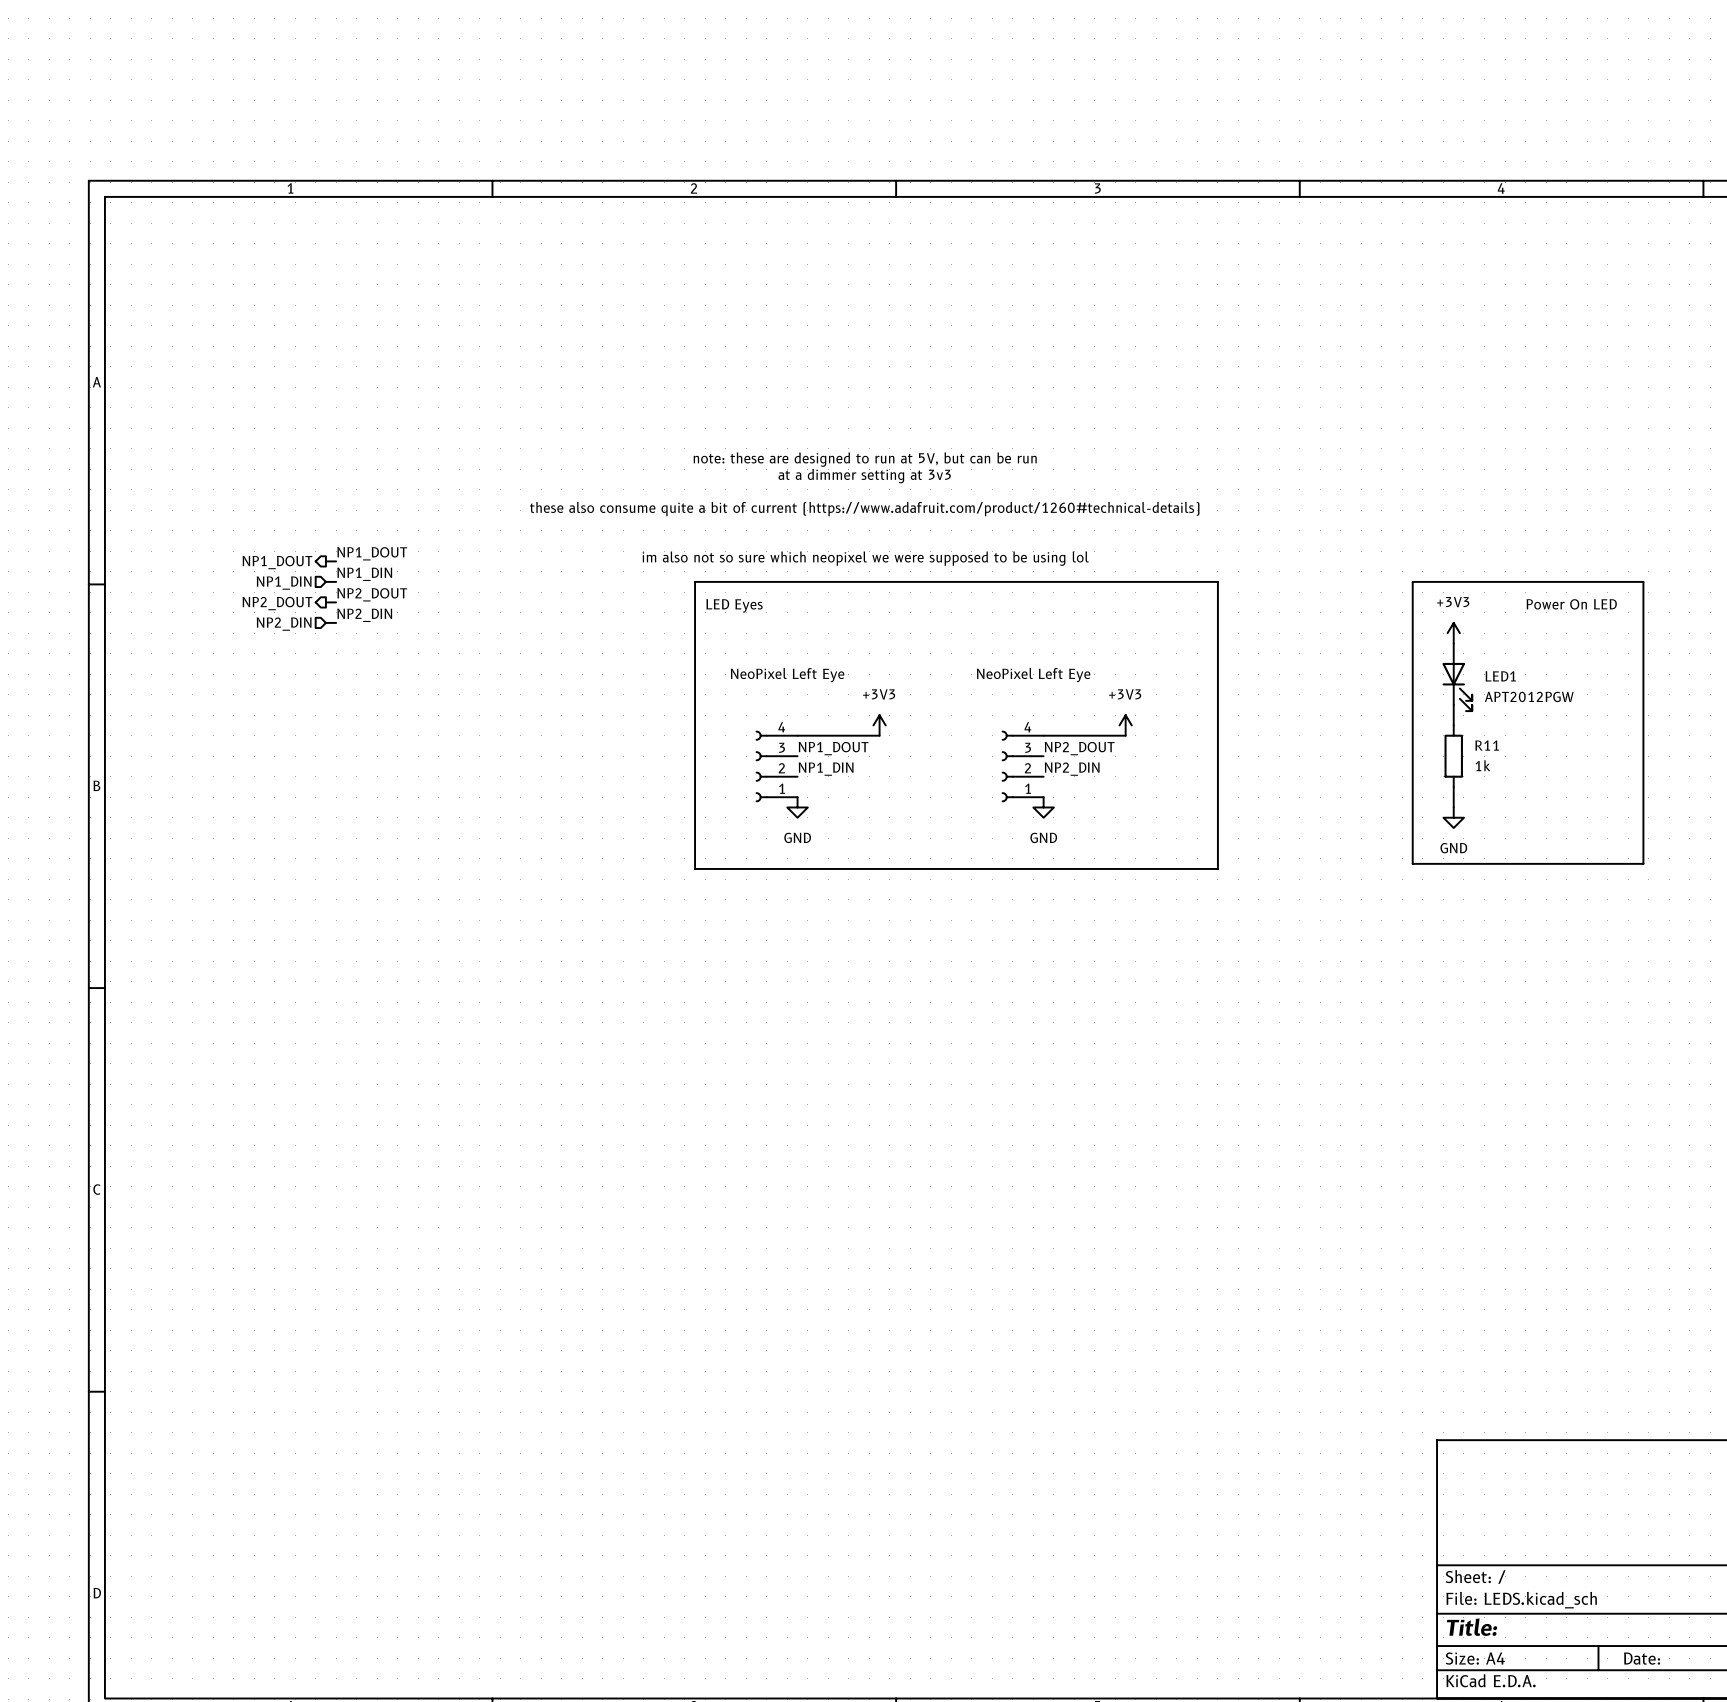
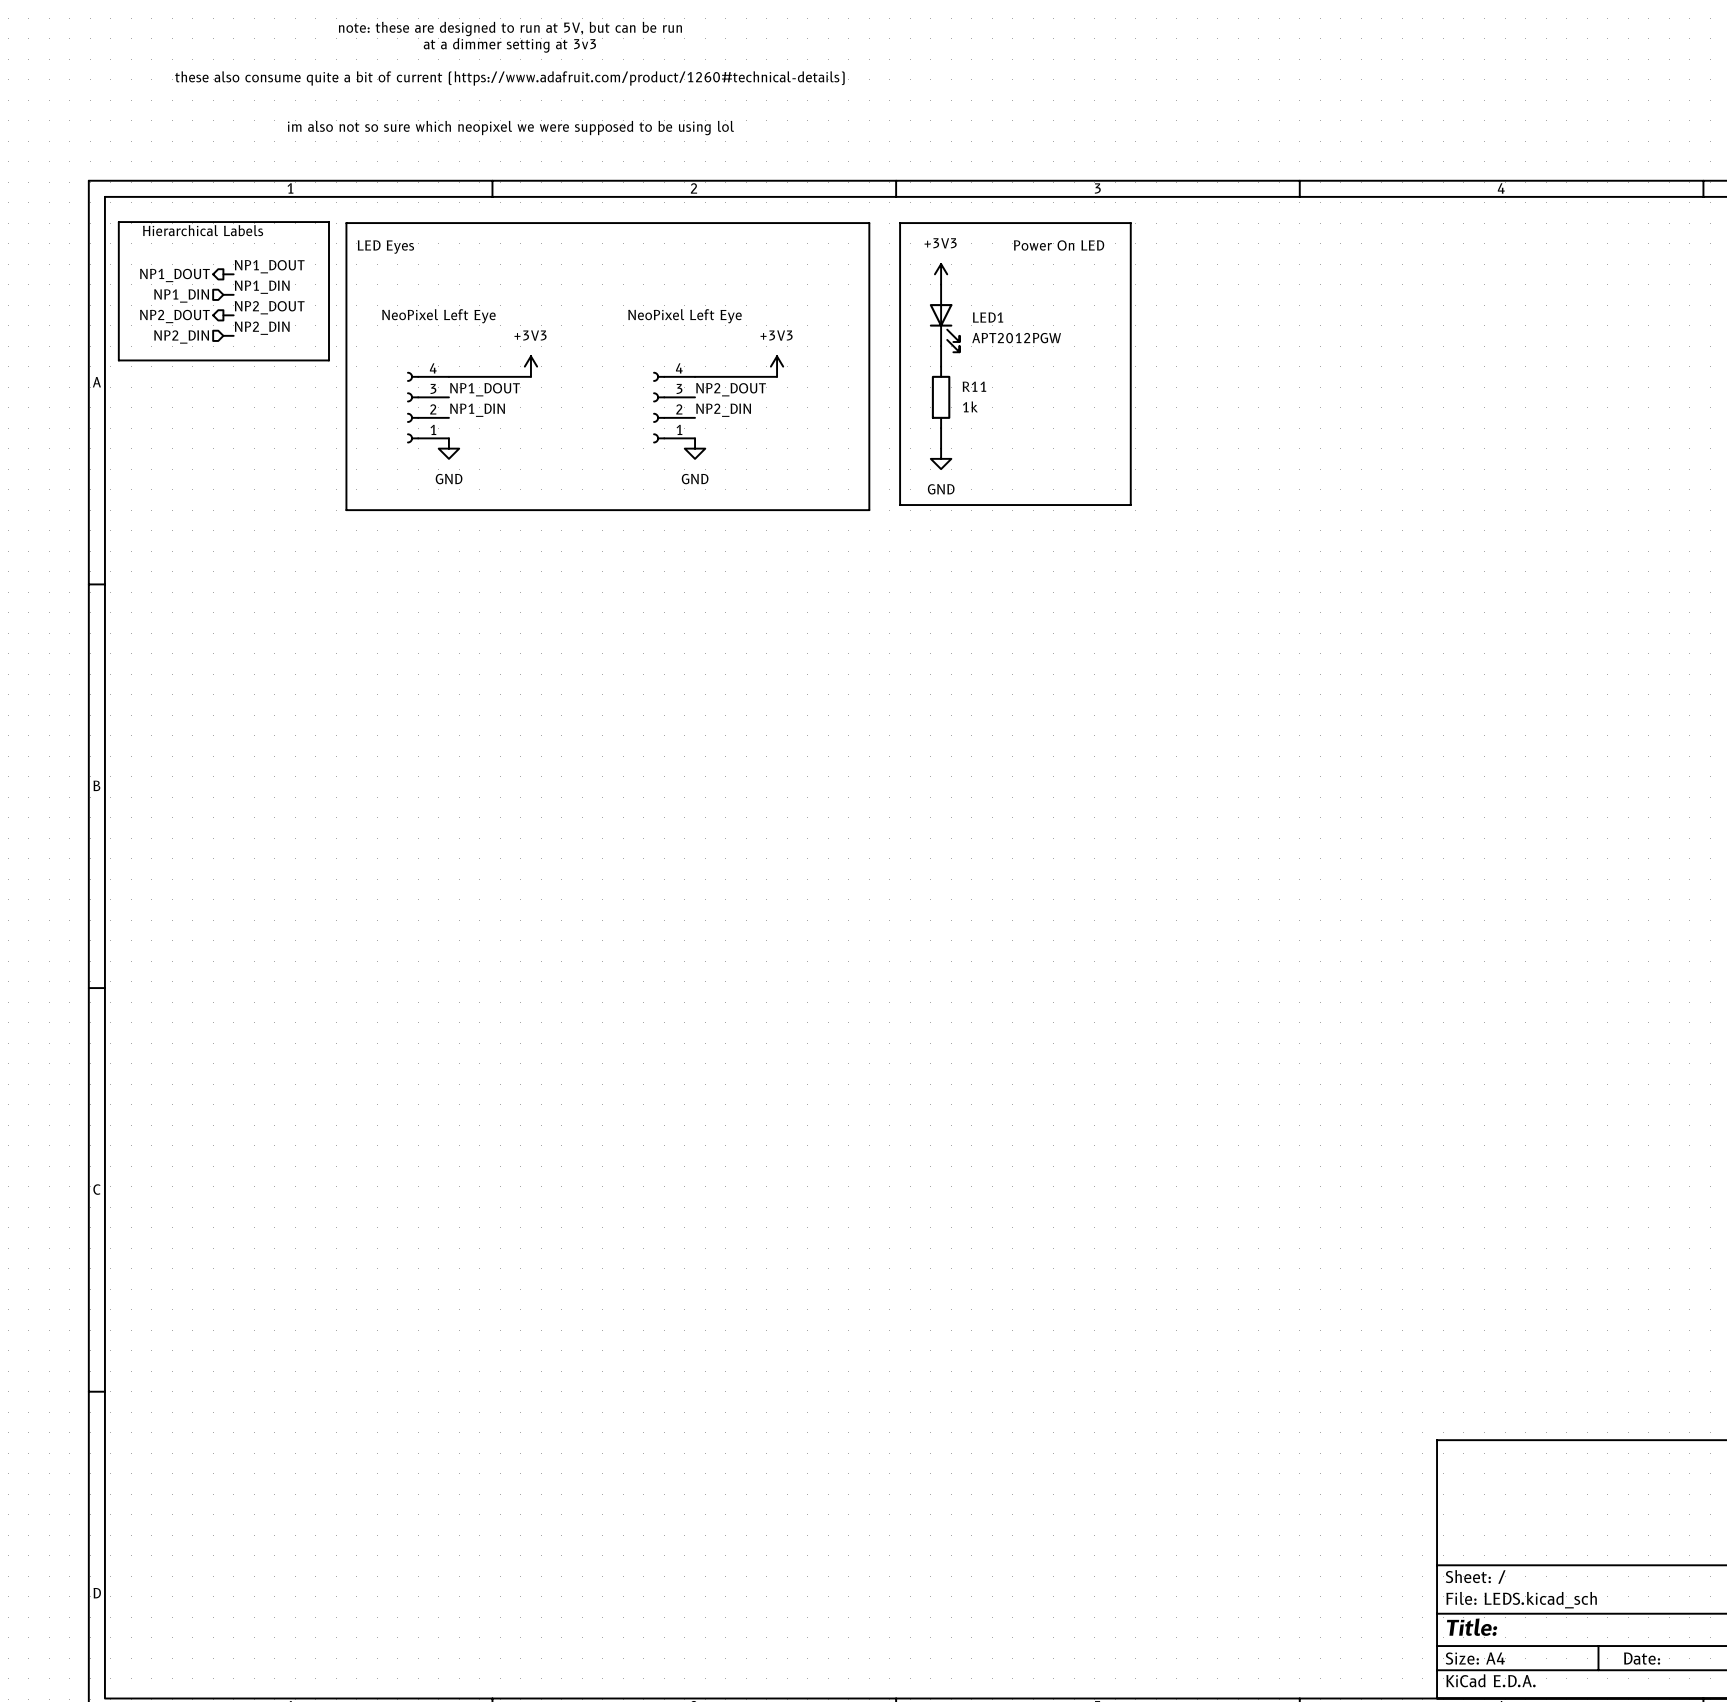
text: none -> note: these are designed to run at 5V, but can be run (510, 29)
text: none -> at a dimmer setting at 3v3 (509, 45)
text: none -> these also consume quite a bit of current (https://www.adafruit.com/product/1260#technical-details) (509, 78)
text: none -> im also not so sure which neopixel we were supposed to be using lol (511, 128)
line: none -> (118, 222) (329, 222) (329, 360) (118, 360) (118, 222)
line: none -> (346, 223) (869, 223) (869, 510) (346, 510) (346, 223)
line: none -> (900, 223) (1130, 223) (1130, 505) (900, 505) (900, 223)
text: none -> Hierarchical Labels (203, 230)
text: none -> Power On LED (1059, 245)
text: none -> LED Eyes (385, 247)
label: none -> NP1_DOUT (269, 266)
wire: none -> (223, 274) (233, 274)
power symbol: none -> +3V3 (941, 274)
hierarchical label: none -> NP1_DOUT (174, 275)
label: none -> NP1_DIN (262, 287)
wire: none -> (223, 294) (233, 294)
hierarchical label: none -> NP1_DIN (181, 295)
label: none -> NP2_DOUT (269, 307)
wire: none -> (223, 315) (233, 315)
hierarchical label: none -> NP2_DOUT (174, 316)
label: none -> NP2_DIN (262, 328)
wire: none -> (223, 335) (233, 335)
hierarchical label: none -> NP2_DIN (181, 336)
wire: none -> (941, 346) (941, 366)
power symbol: none -> +3V3 (530, 366)
power symbol: none -> +3V3 (777, 366)
wire: none -> (448, 376) (530, 376)
wire: none -> (695, 376) (777, 376)
label: none -> NP1_DOUT (484, 389)
label: none -> NP2_DOUT (731, 389)
part: none -> NeoPixel Left Eye (428, 407)
part: none -> NeoPixel Left Eye (674, 407)
label: none -> NP1_DIN (477, 410)
label: none -> NP2_DIN (723, 410)
wire: none -> (941, 428) (941, 448)
power symbol: none -> GND (448, 448)
power symbol: none -> GND (695, 448)
power symbol: none -> GND (941, 458)
text: note: these are designed to run at 5V, but can be run (865, 459) -> none
text: at a dimmer setting at 3v3 (864, 476) -> none
text: these also consume quite a bit of current (https://www.adafruit.com/product/1260#technical-details) (864, 509) -> none
label: NP1_DOUT (372, 553) -> none
text: im also not so sure which neopixel we were supposed to be using lol (865, 558) -> none
wire: (325, 561) (336, 561) -> none
hierarchical label: NP1_DOUT (277, 562) -> none
label: NP1_DIN (364, 574) -> none
wire: (325, 581) (336, 581) -> none
line: (695, 581) (1217, 581) (1217, 868) (695, 868) (695, 581) -> none
line: (1412, 581) (1643, 581) (1643, 863) (1412, 863) (1412, 581) -> none
hierarchical label: NP1_DIN (284, 583) -> none
label: NP2_DOUT (372, 594) -> none
wire: (325, 602) (336, 602) -> none
hierarchical label: NP2_DOUT (277, 603) -> none
text: Power On LED (1571, 604) -> none
text: LED Eyes (734, 605) -> none
label: NP2_DIN (364, 615) -> none
wire: (325, 622) (336, 622) -> none
hierarchical label: NP2_DIN (284, 624) -> none
power symbol: +3V3 (1453, 633) -> none
LED1 position: (1457, 677) -> (944, 318)
wire: (1453, 704) (1453, 725) -> none
power symbol: +3V3 (879, 725) -> none
power symbol: +3V3 (1125, 725) -> none
wire: (797, 735) (879, 735) -> none
wire: (1043, 735) (1125, 735) -> none
label: NP1_DOUT (833, 748) -> none
label: NP2_DOUT (1079, 748) -> none
R11 position: (1453, 756) -> (941, 397)
part: NeoPixel Left Eye (776, 766) -> none
part: NeoPixel Left Eye (1022, 766) -> none
label: NP1_DIN (826, 769) -> none
label: NP2_DIN (1072, 769) -> none
wire: (1453, 786) (1453, 807) -> none
power symbol: GND (797, 807) -> none
power symbol: GND (1043, 807) -> none
power symbol: GND (1453, 817) -> none

